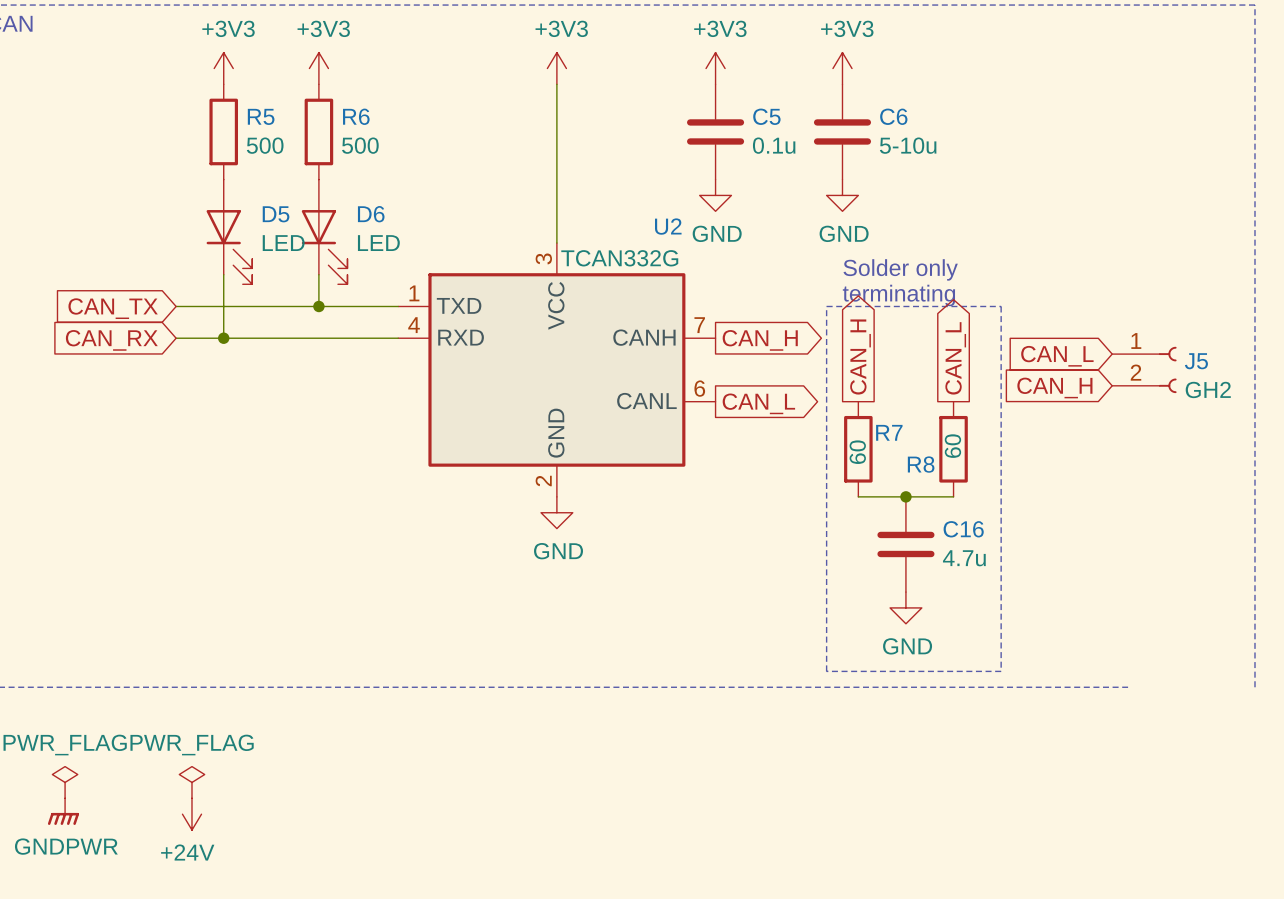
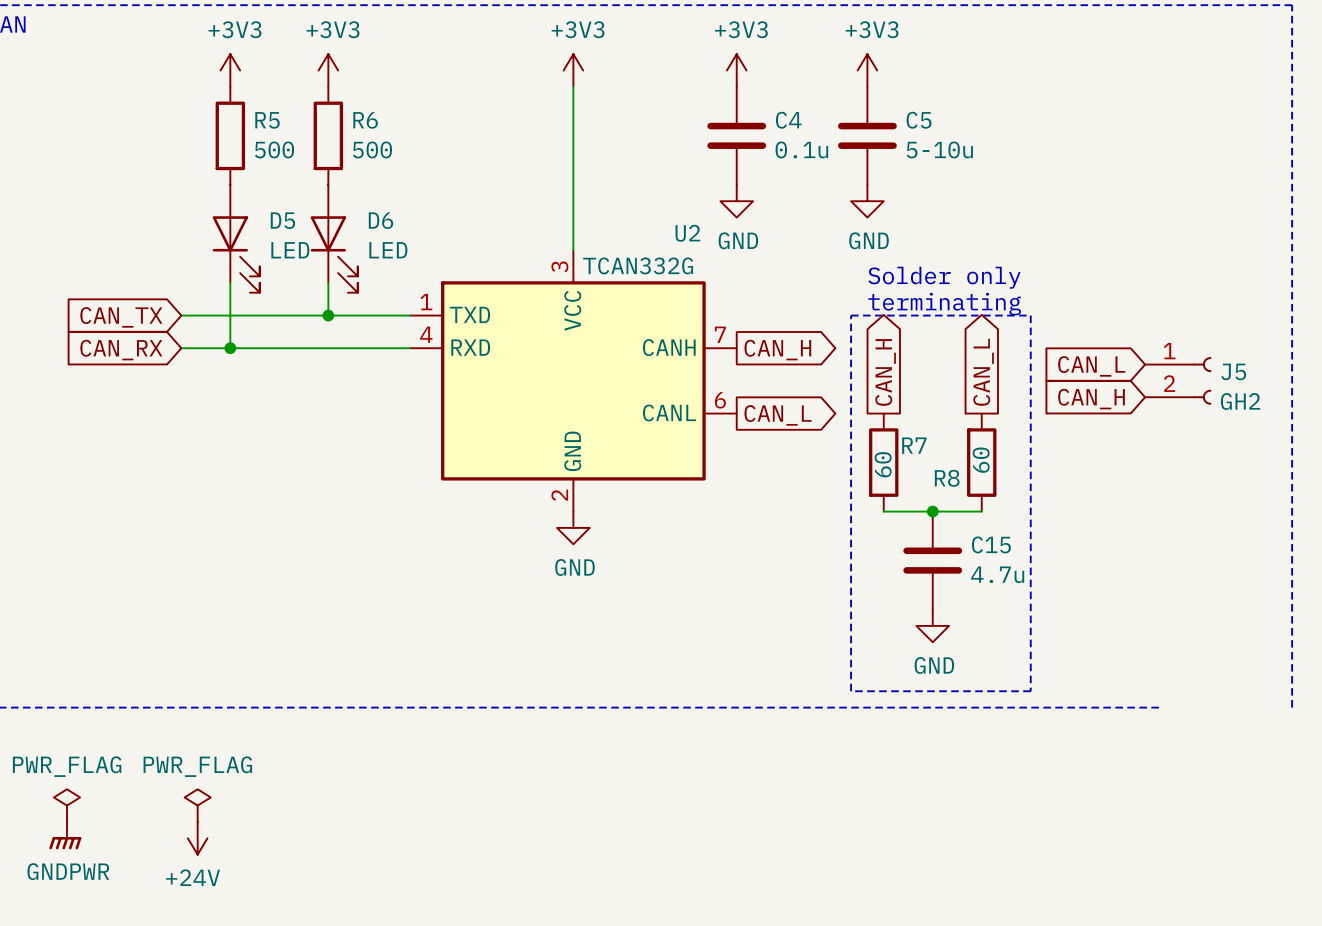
C5 name: C5 (766, 116) -> C4 (788, 120)
C6 name: C6 (893, 116) -> C5 (919, 120)
C16 name: C16 (963, 529) -> C15 (991, 544)

